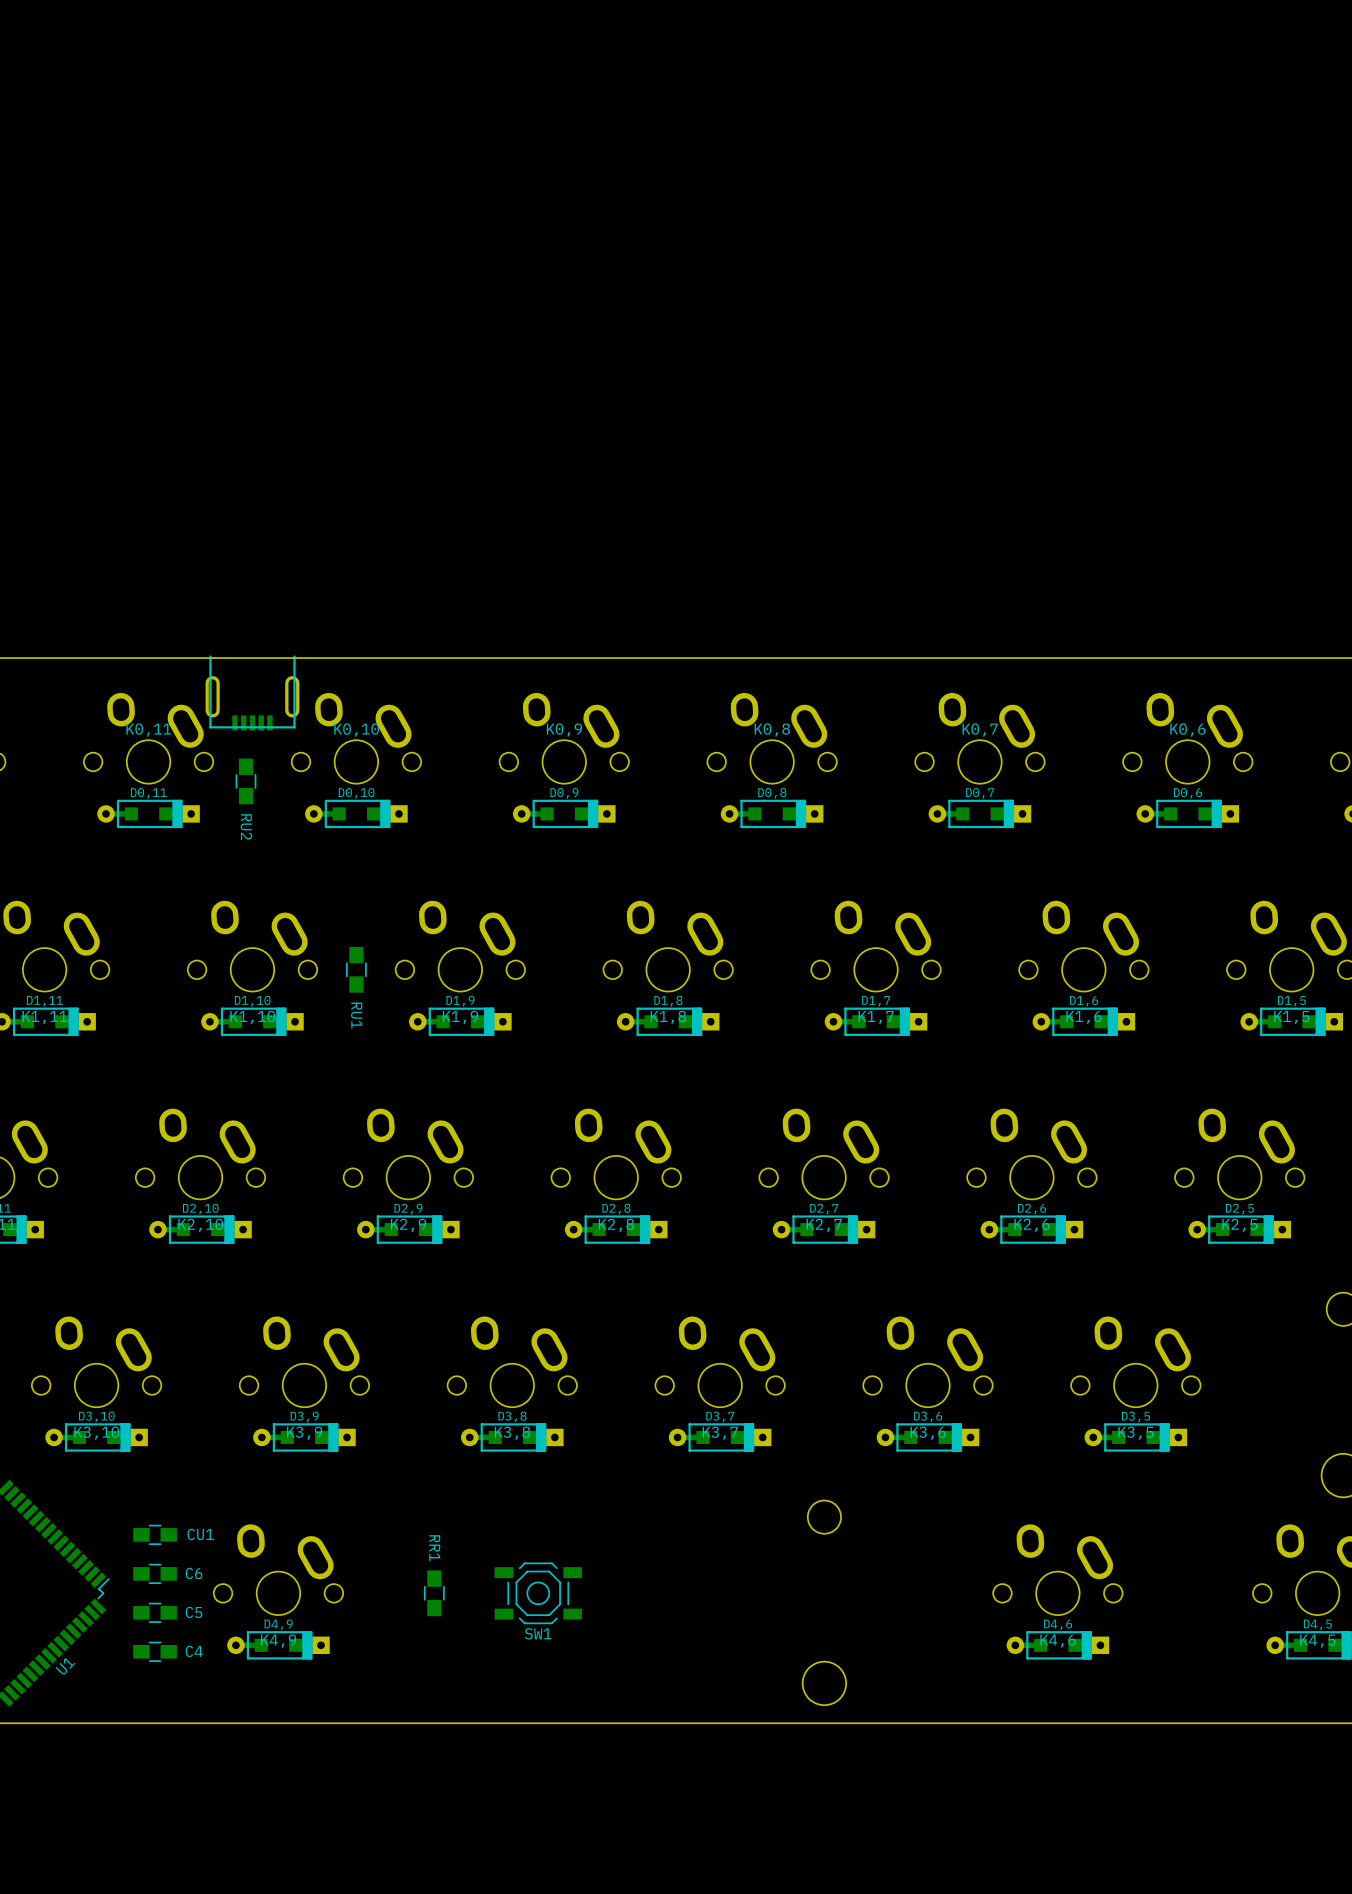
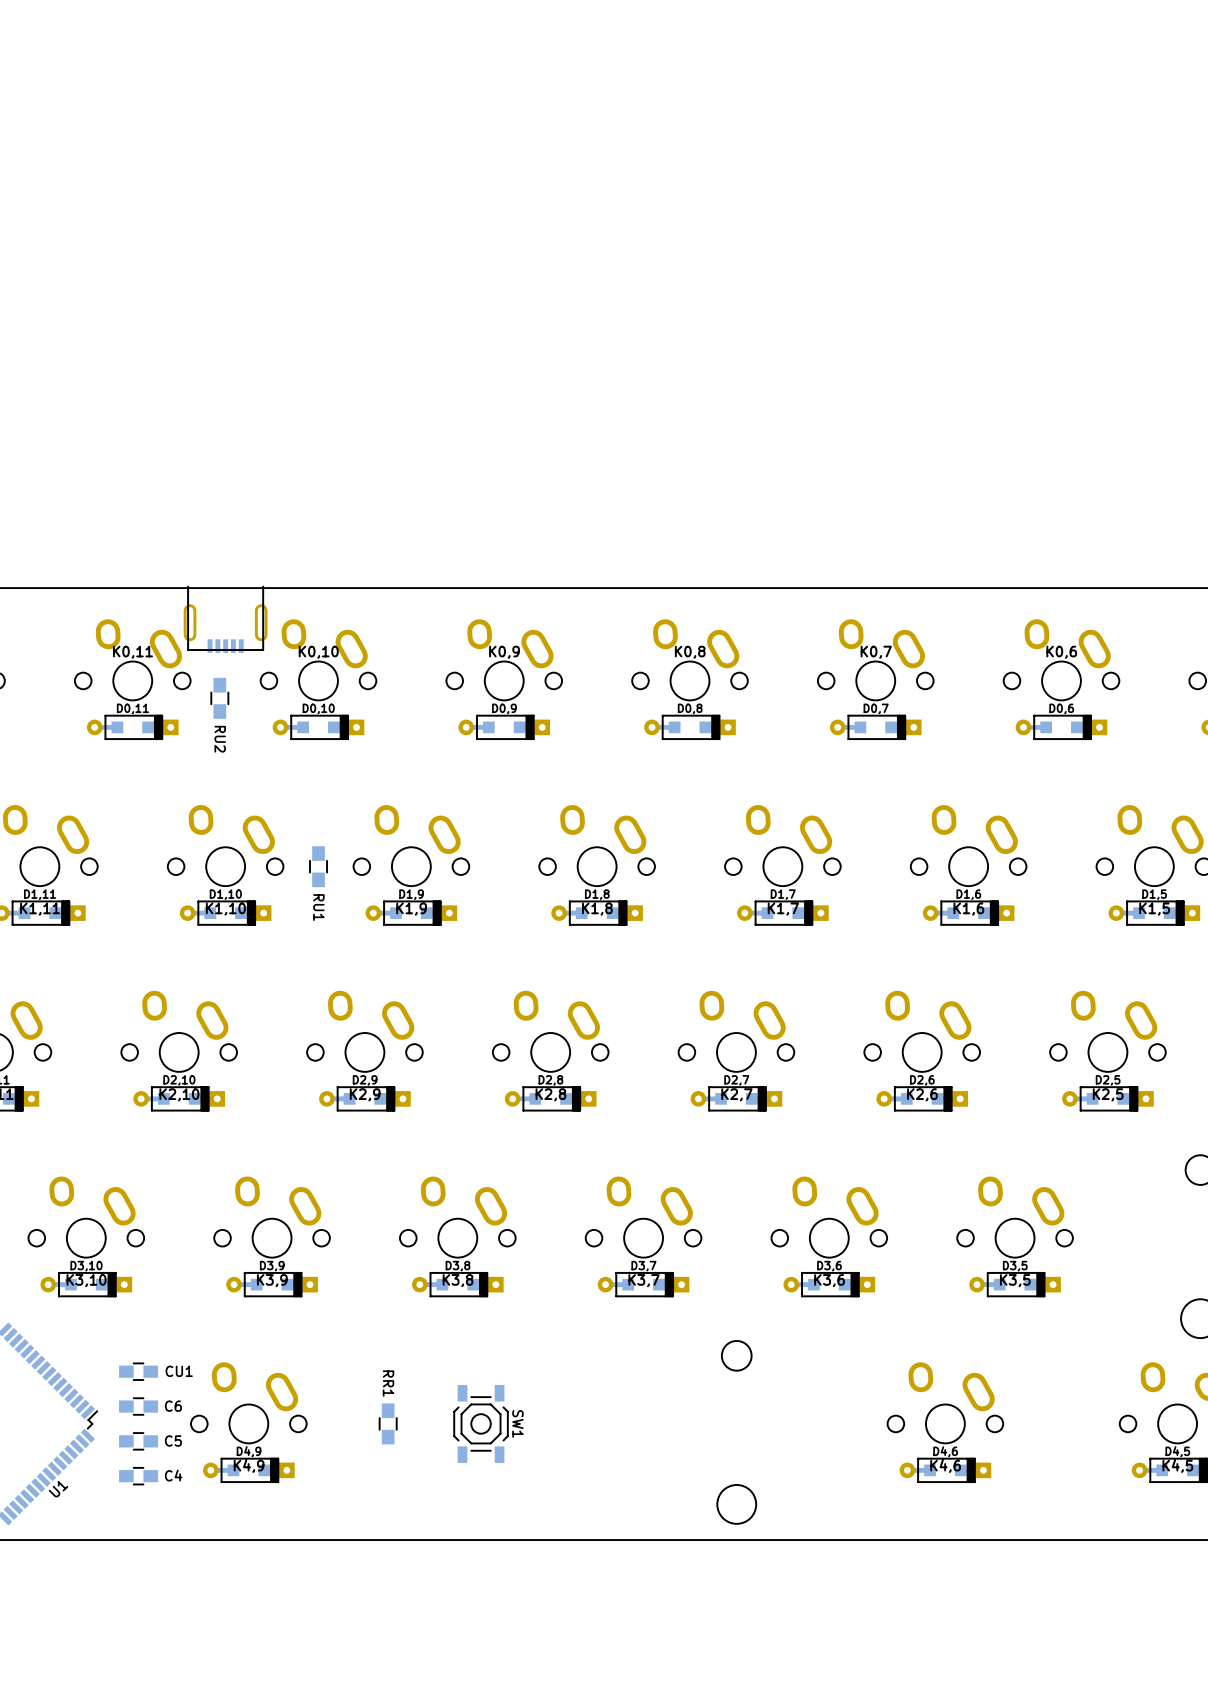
SW1 rotation: 0° (538, 1593) -> 90° clockwise (481, 1423)
SW1 name position: SW1 (538, 1633) -> SW1 (517, 1423)

